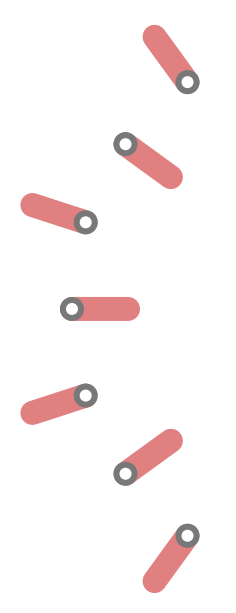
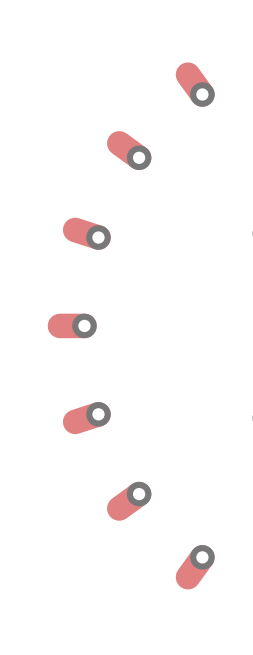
track: (154, 36) (173, 62) -> none
track: (125, 144) (170, 177) -> (139, 157) (119, 143)
track: (32, 204) (62, 214) -> none
track: (71, 308) (128, 308) -> (84, 325) (59, 325)
track: (62, 403) (32, 412) -> none
track: (170, 440) (125, 473) -> (119, 508) (139, 494)
track: (173, 555) (154, 581) -> none

